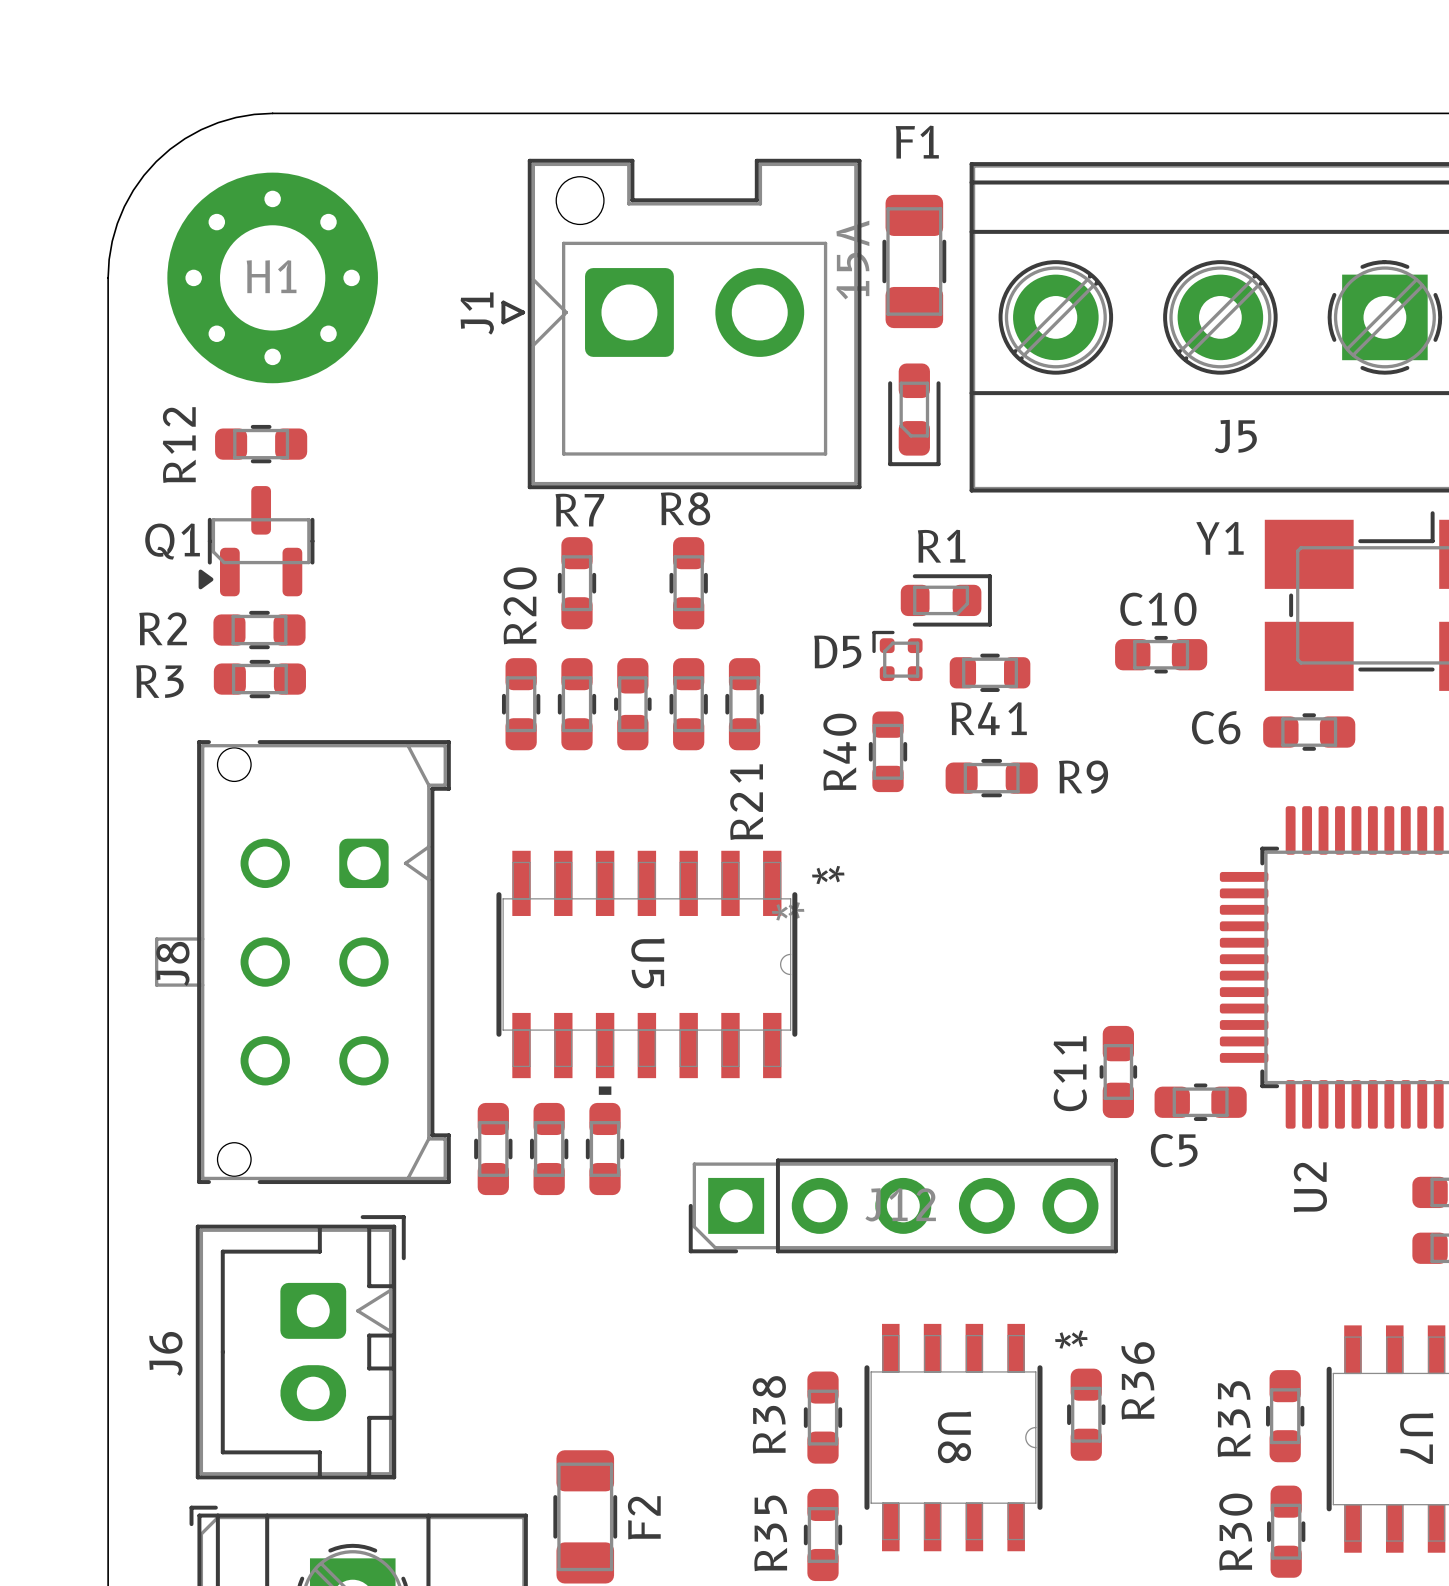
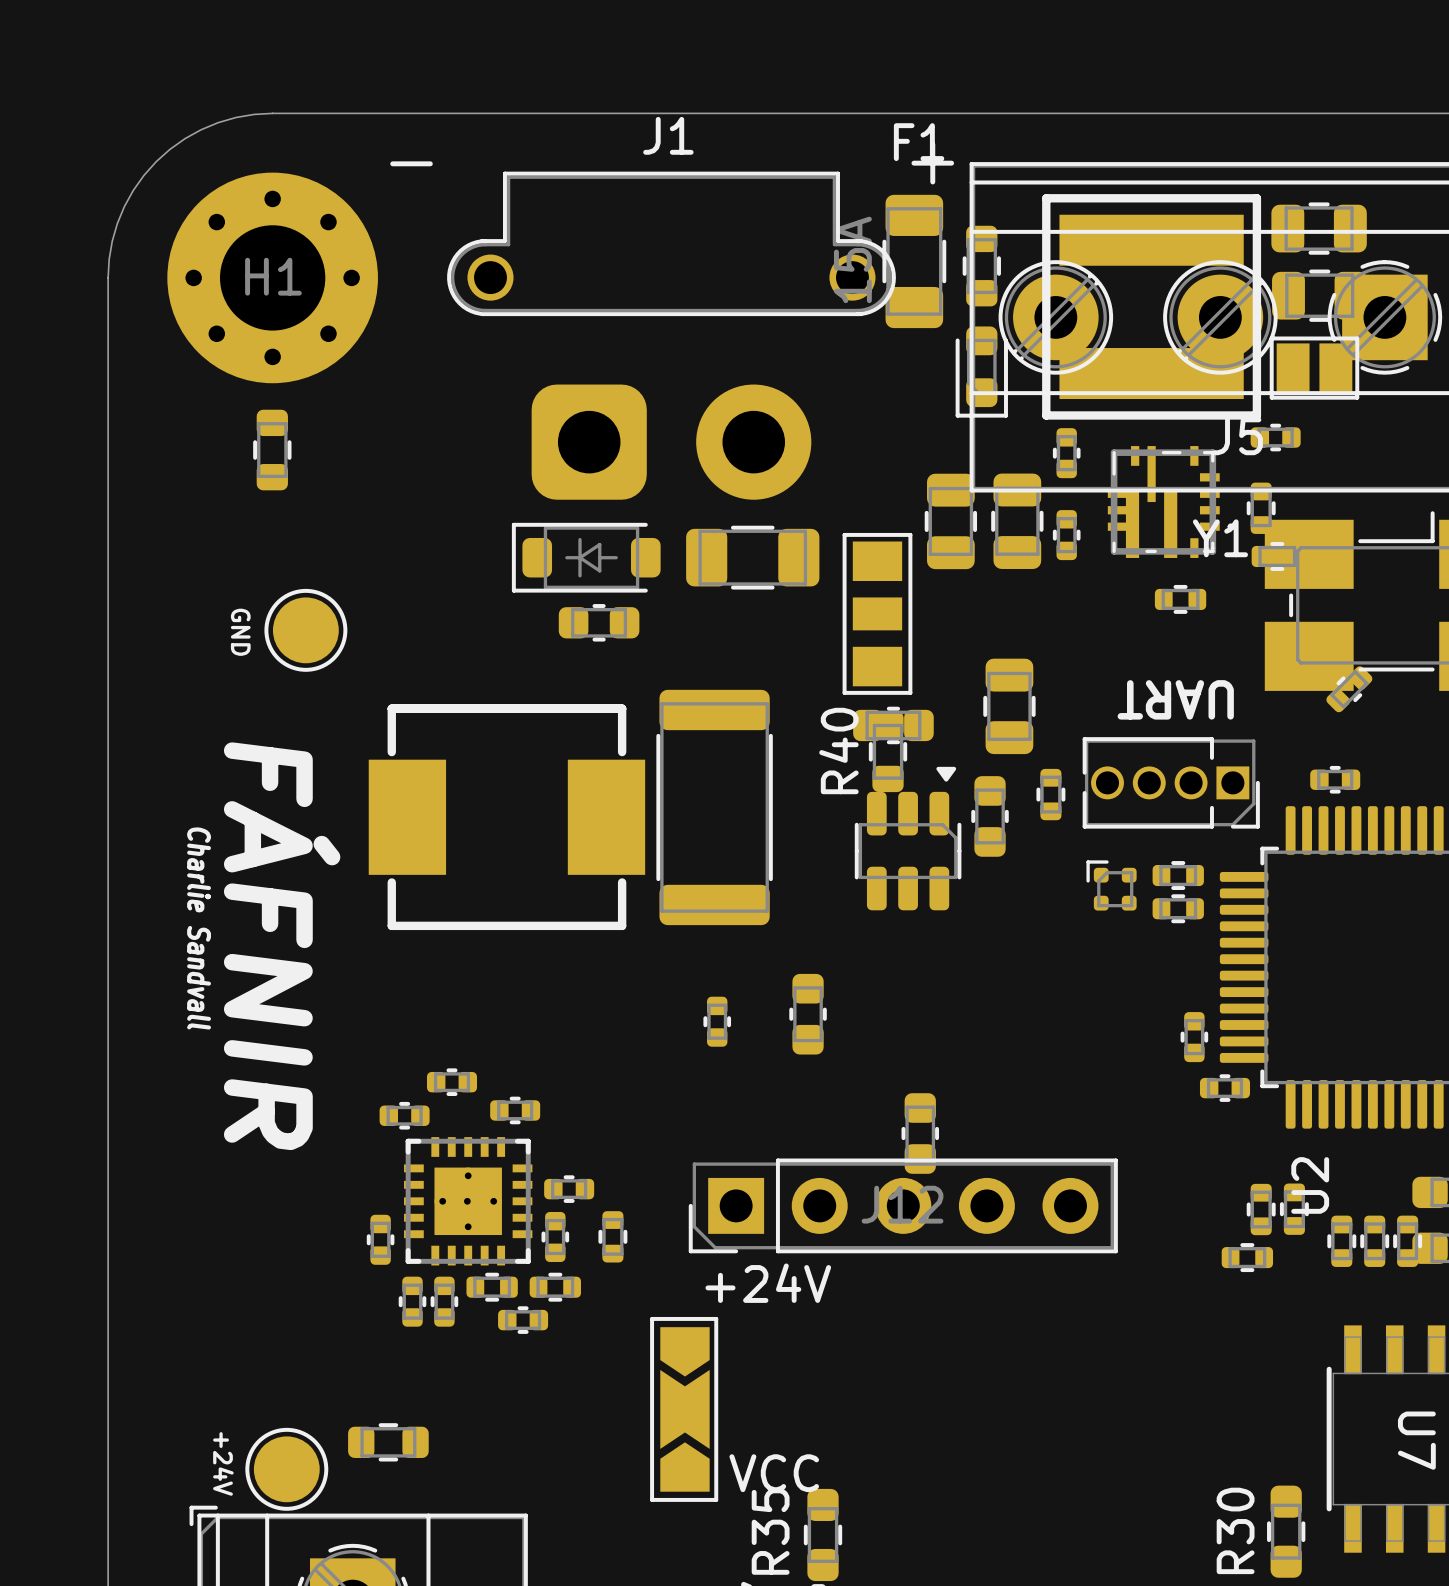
J1 footprint: [501, 158, 862, 490] -> [447, 171, 896, 500]
part: none -> (1319, 228)
part: none -> (981, 266)
part: none -> (1319, 295)
part: none -> (1151, 306)
J1 name position: J1 (477, 313) -> J1 (668, 135)
part: none -> (1314, 368)
part: none -> (981, 372)
part: (914, 414) -> none
part: none -> (1275, 437)
R12: (261, 444) -> none
part: none -> (272, 450)
part: none -> (1066, 453)
part: none -> (1171, 502)
part: none -> (1261, 508)
part: none -> (950, 521)
part: none -> (1017, 521)
part: none -> (1066, 535)
Q1: (256, 541) -> none
part: none -> (1277, 556)
part: none -> (586, 557)
part: none -> (752, 557)
R7: (576, 583) -> none
R8: (688, 583) -> none
part: none -> (1180, 599)
R1: (946, 600) -> none
part: none -> (877, 613)
part: none -> (599, 622)
text: none -> GND (240, 632)
R2: (259, 630) -> none
part: none -> (305, 630)
C10: (1161, 654) -> none
D5: (897, 655) -> none
R41: (990, 672) -> none
R3: (259, 679) -> none
part: none -> (1349, 689)
text: none -> UART (1175, 699)
R20: (521, 704) -> none
part: (576, 704) -> none
part: (632, 704) -> none
part: (688, 704) -> none
R21: (744, 704) -> none
part: none -> (1009, 706)
part: none -> (893, 725)
C6: (1309, 732) -> none
R9: (991, 778) -> none
part: none -> (1335, 779)
part: none -> (1171, 782)
part: none -> (1050, 794)
part: none -> (714, 807)
part: none -> (990, 816)
part: none -> (506, 817)
part: none -> (908, 838)
part: none -> (1178, 875)
part: none -> (1111, 885)
text: none -> Charlie Sandvall (199, 928)
part: none -> (1178, 908)
text: none -> FÁFNIR (282, 946)
J8: (302, 962) -> none
U5: (646, 972) -> none
part: none -> (808, 1014)
part: none -> (717, 1021)
part: none -> (1194, 1037)
C11: (1118, 1071) -> none
part: none -> (451, 1082)
part: none -> (1224, 1088)
C5: (1200, 1102) -> none
part: none -> (515, 1110)
part: none -> (404, 1115)
part: none -> (920, 1133)
part: (493, 1149) -> none
part: (549, 1149) -> none
part: (605, 1149) -> none
part: none -> (569, 1189)
part: none -> (472, 1201)
part: none -> (1261, 1209)
part: none -> (1294, 1209)
part: none -> (612, 1236)
part: none -> (555, 1237)
part: none -> (380, 1239)
part: none -> (1341, 1241)
part: none -> (1374, 1241)
part: none -> (1407, 1241)
part: none -> (1247, 1257)
part: none -> (492, 1287)
part: none -> (555, 1287)
part: none -> (412, 1301)
part: none -> (444, 1301)
part: none -> (523, 1320)
J6: (300, 1347) -> none
part: none -> (684, 1409)
R36: (1086, 1414) -> none
R33: (1285, 1416) -> none
R38: (823, 1417) -> none
U8: (953, 1437) -> none
part: none -> (388, 1442)
text: none -> +24V (223, 1463)
part: none -> (286, 1469)
F2: (585, 1516) -> none

